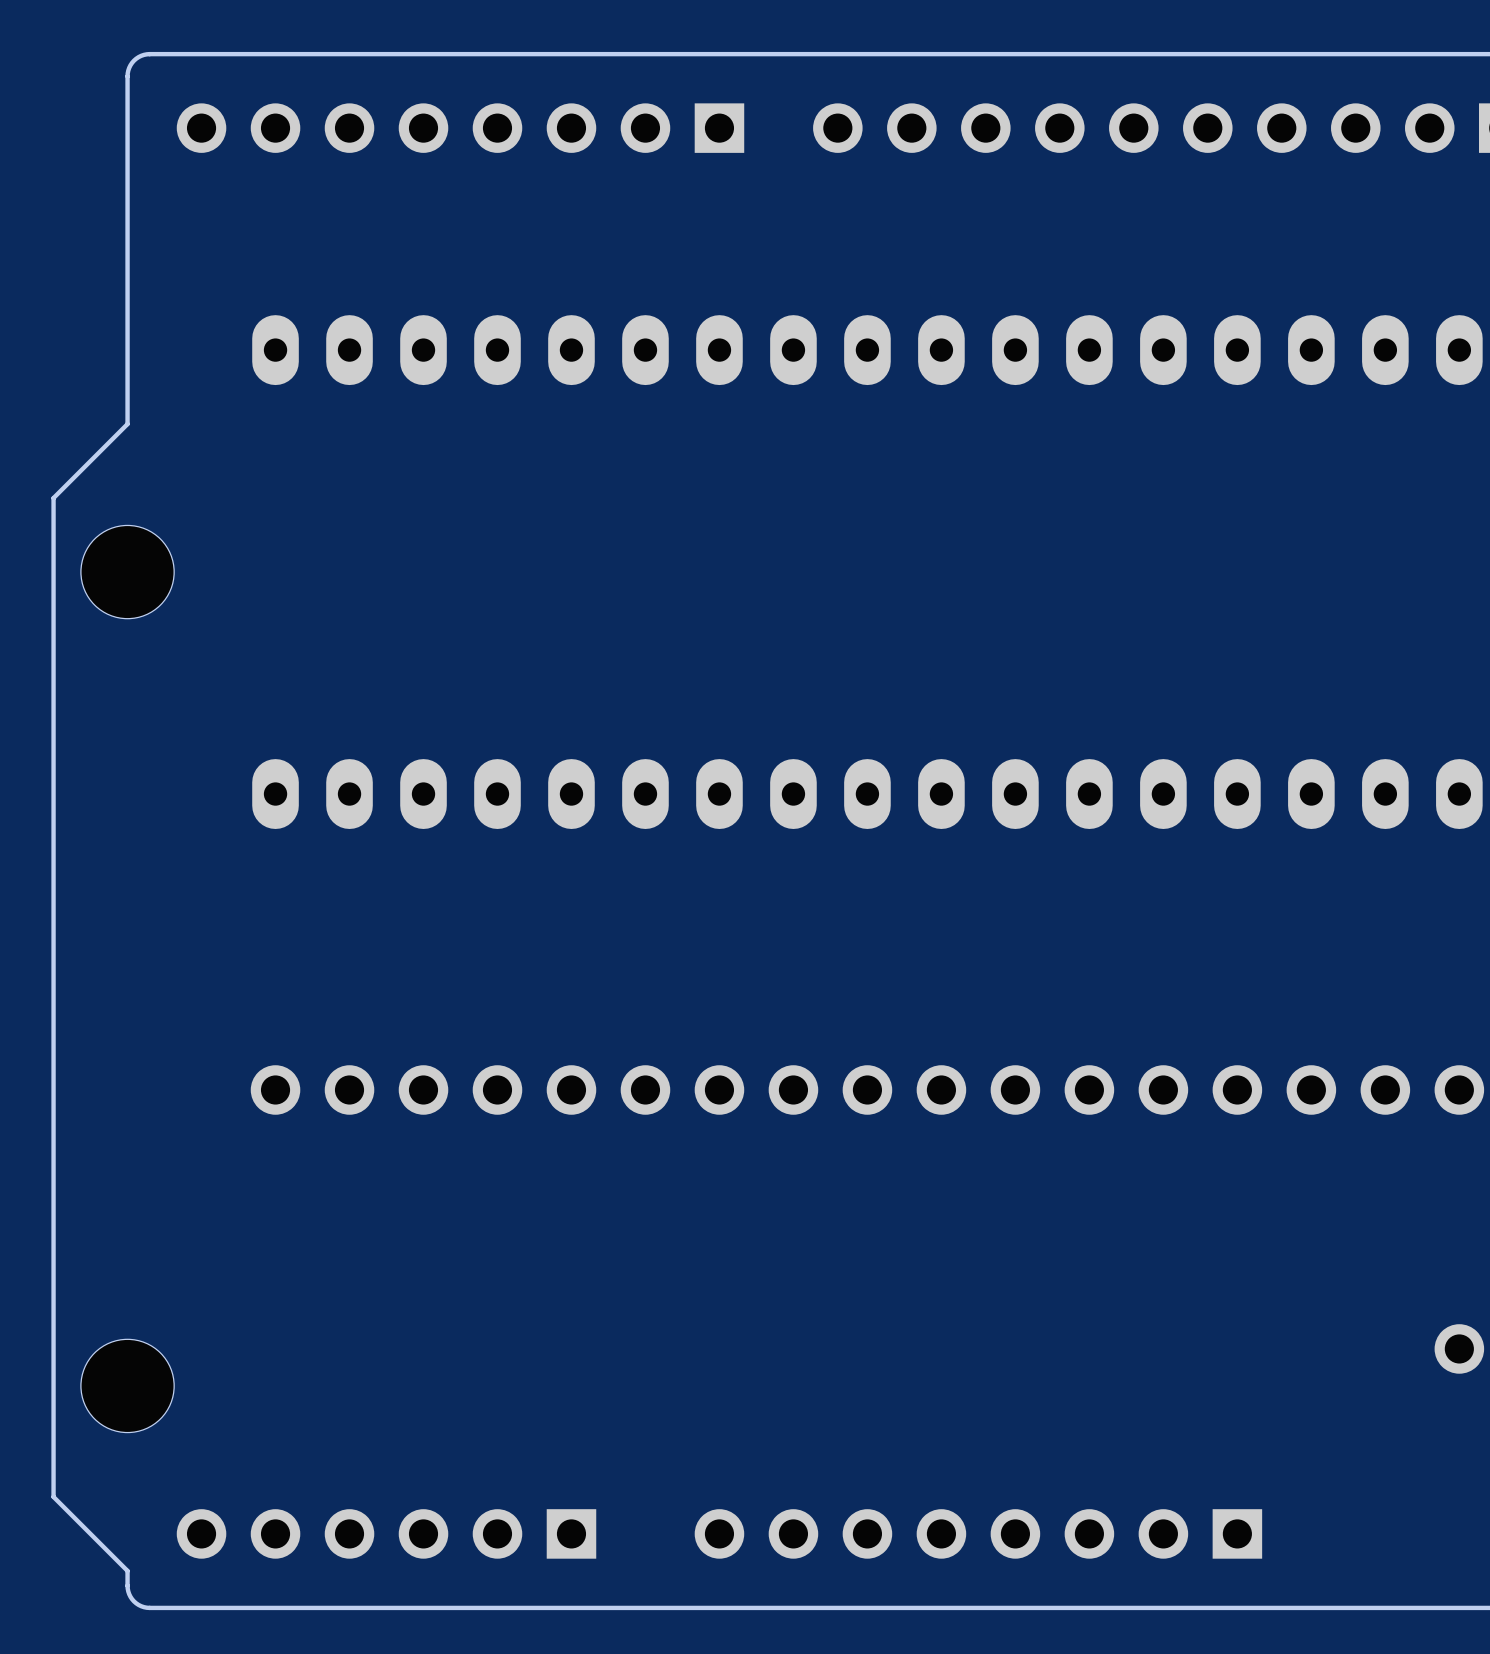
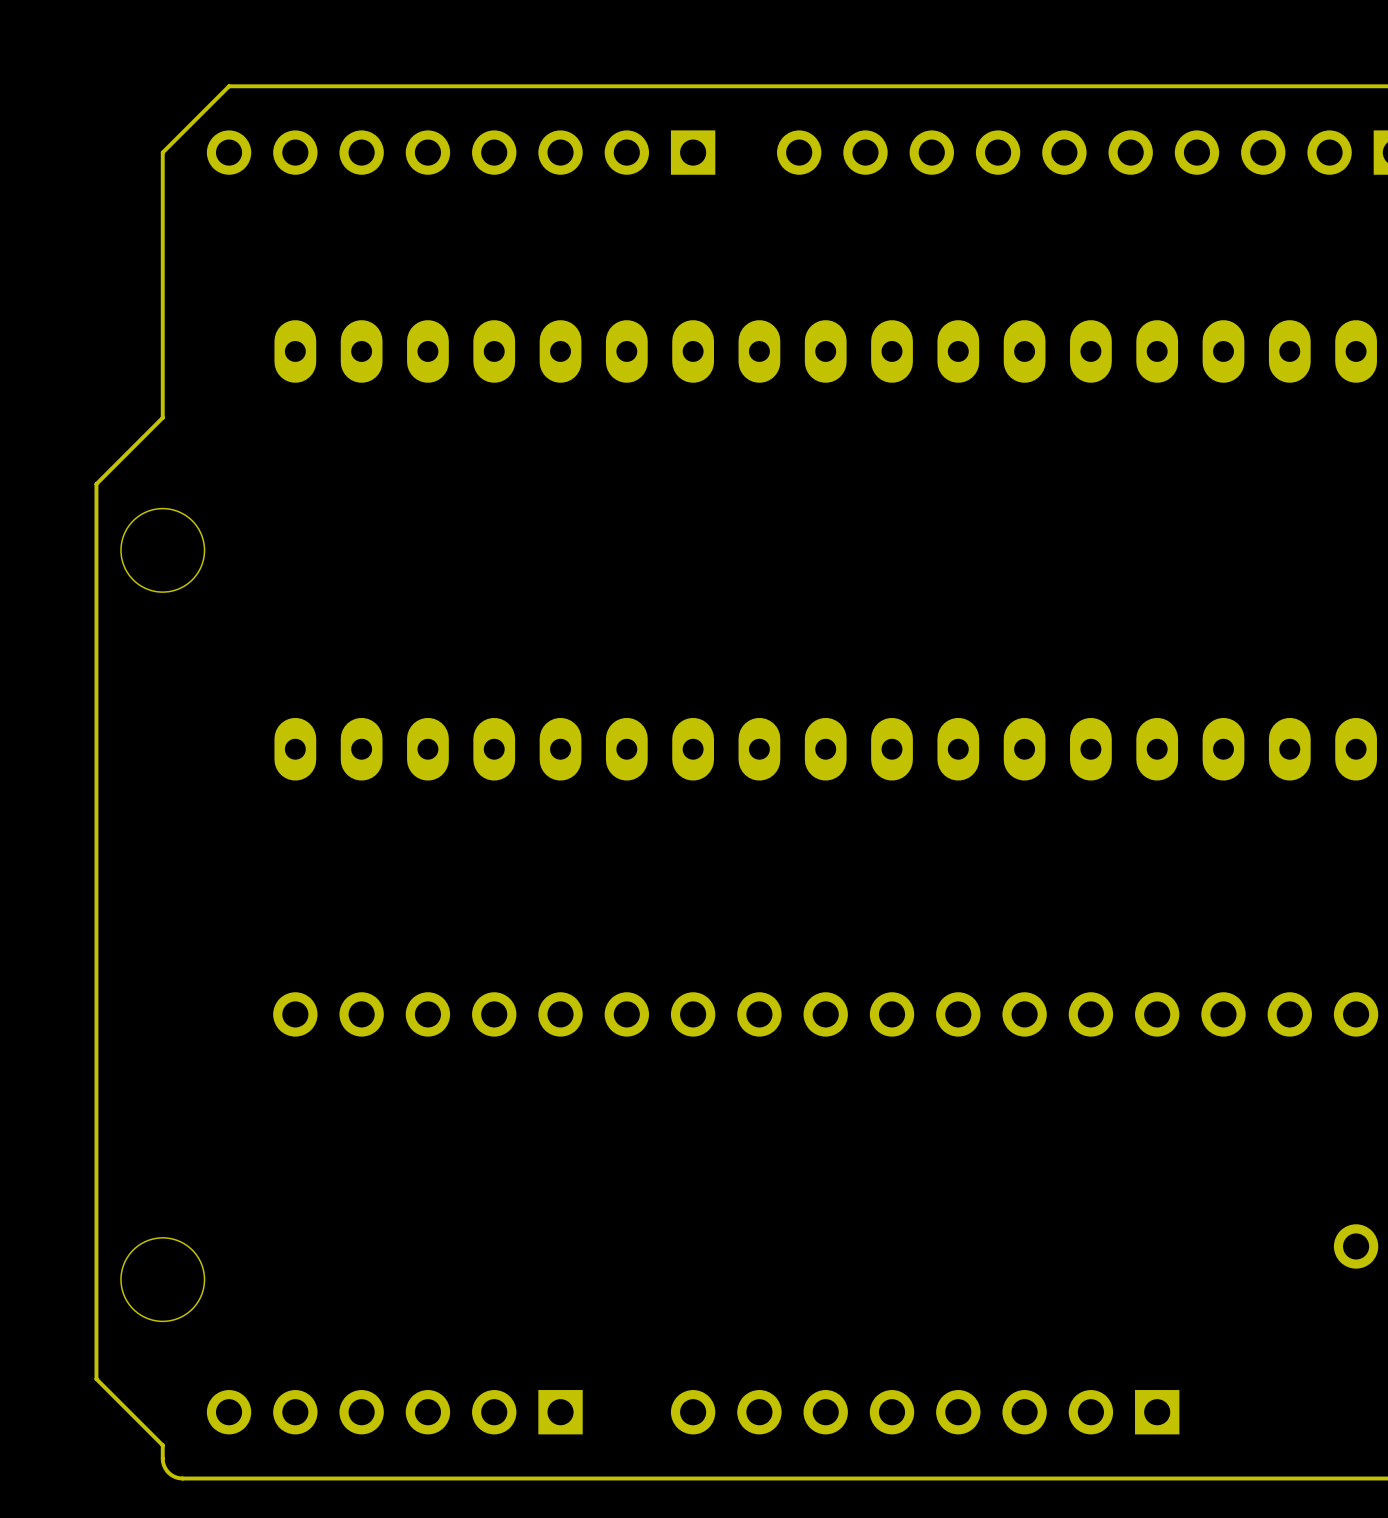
board edge: (201, 54) (146, 54) (134, 60) (127, 73) (127, 128) -> (229, 86) (162, 152)

